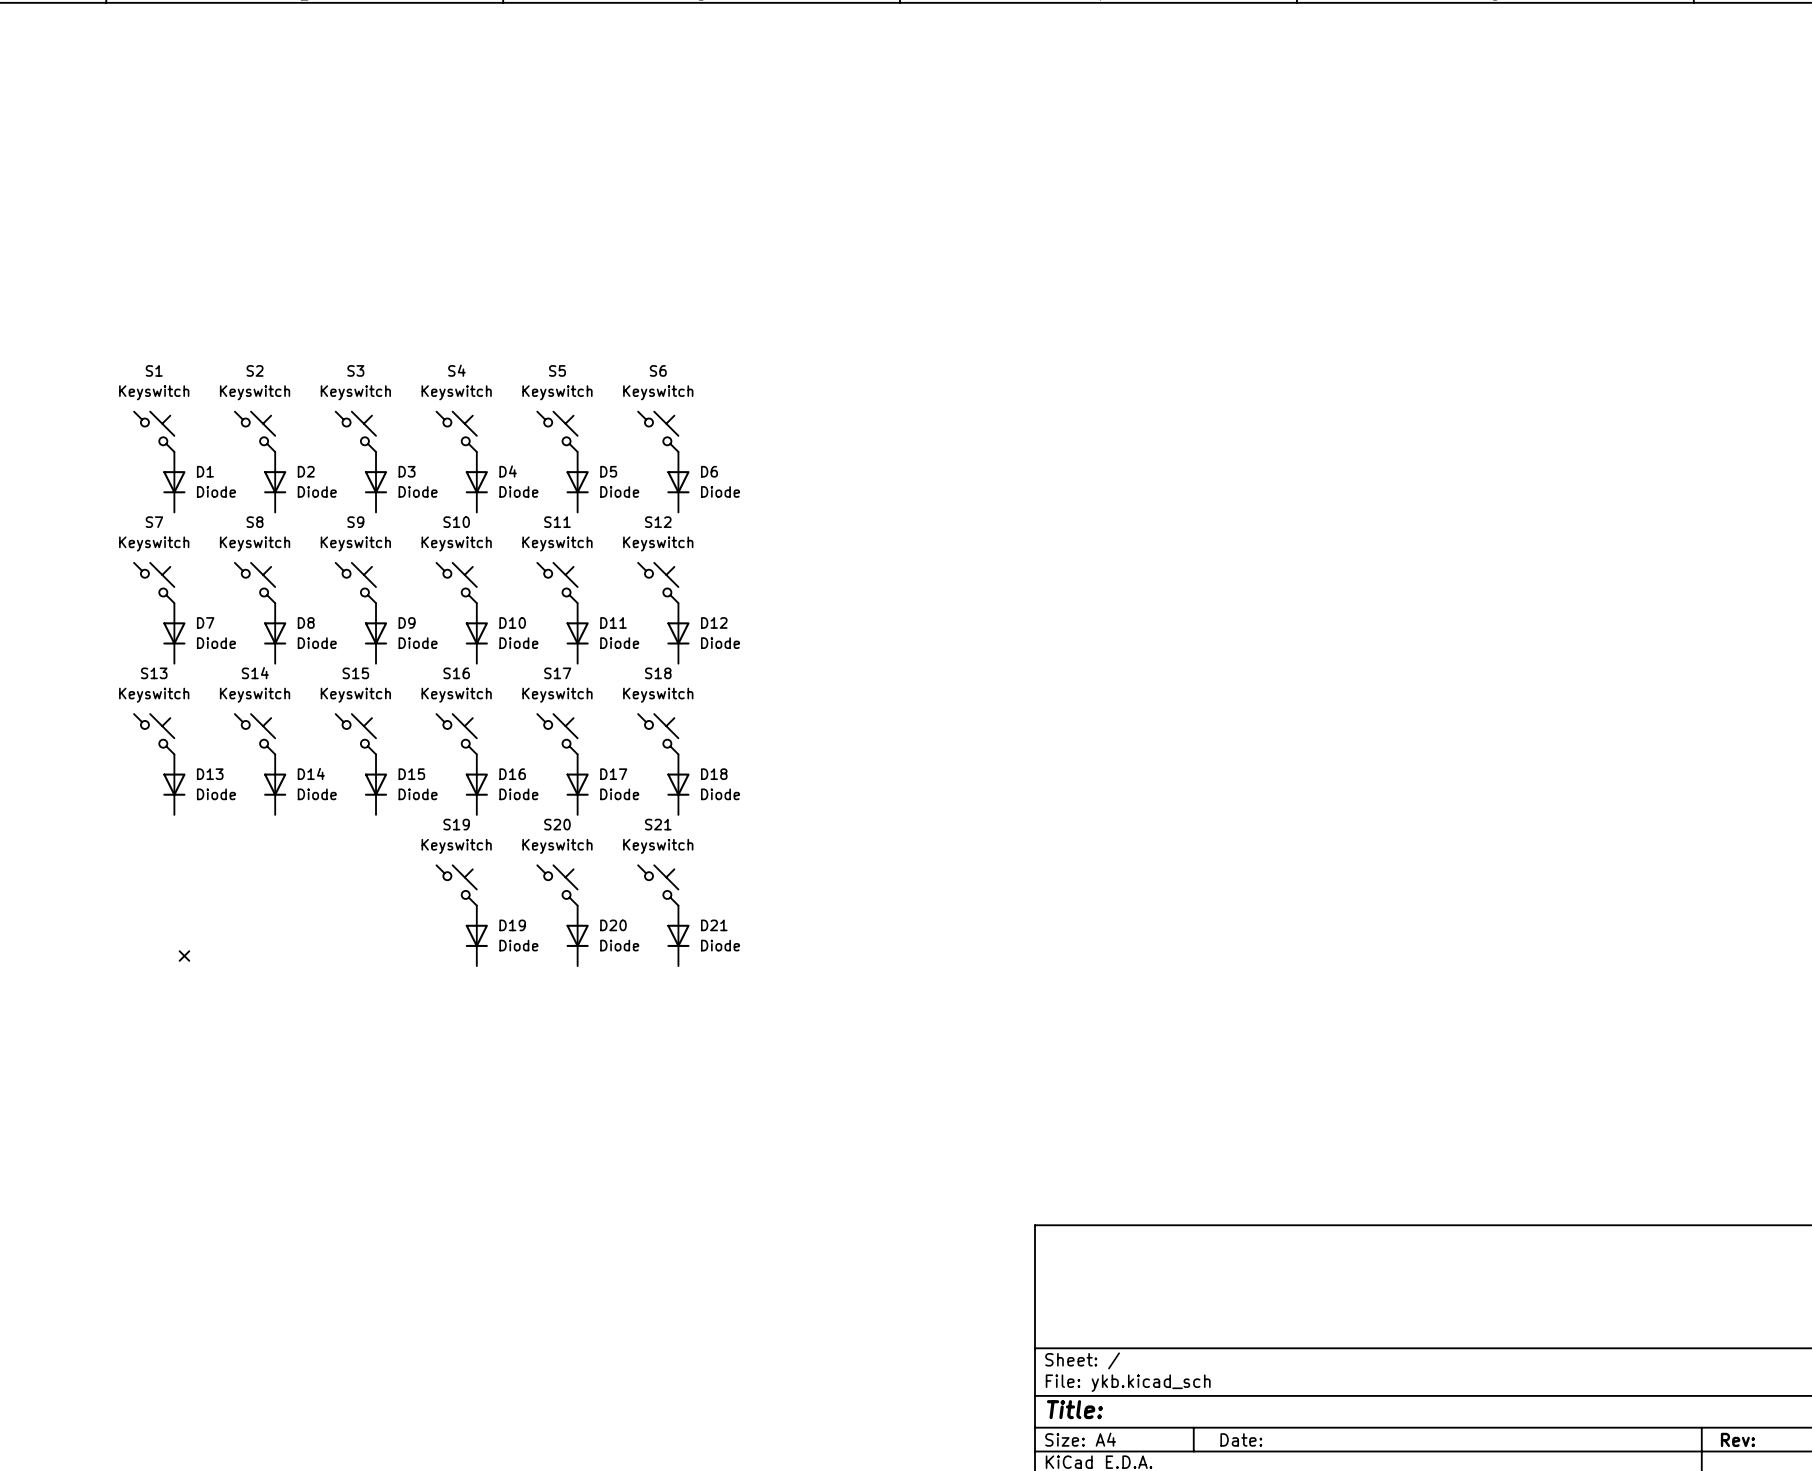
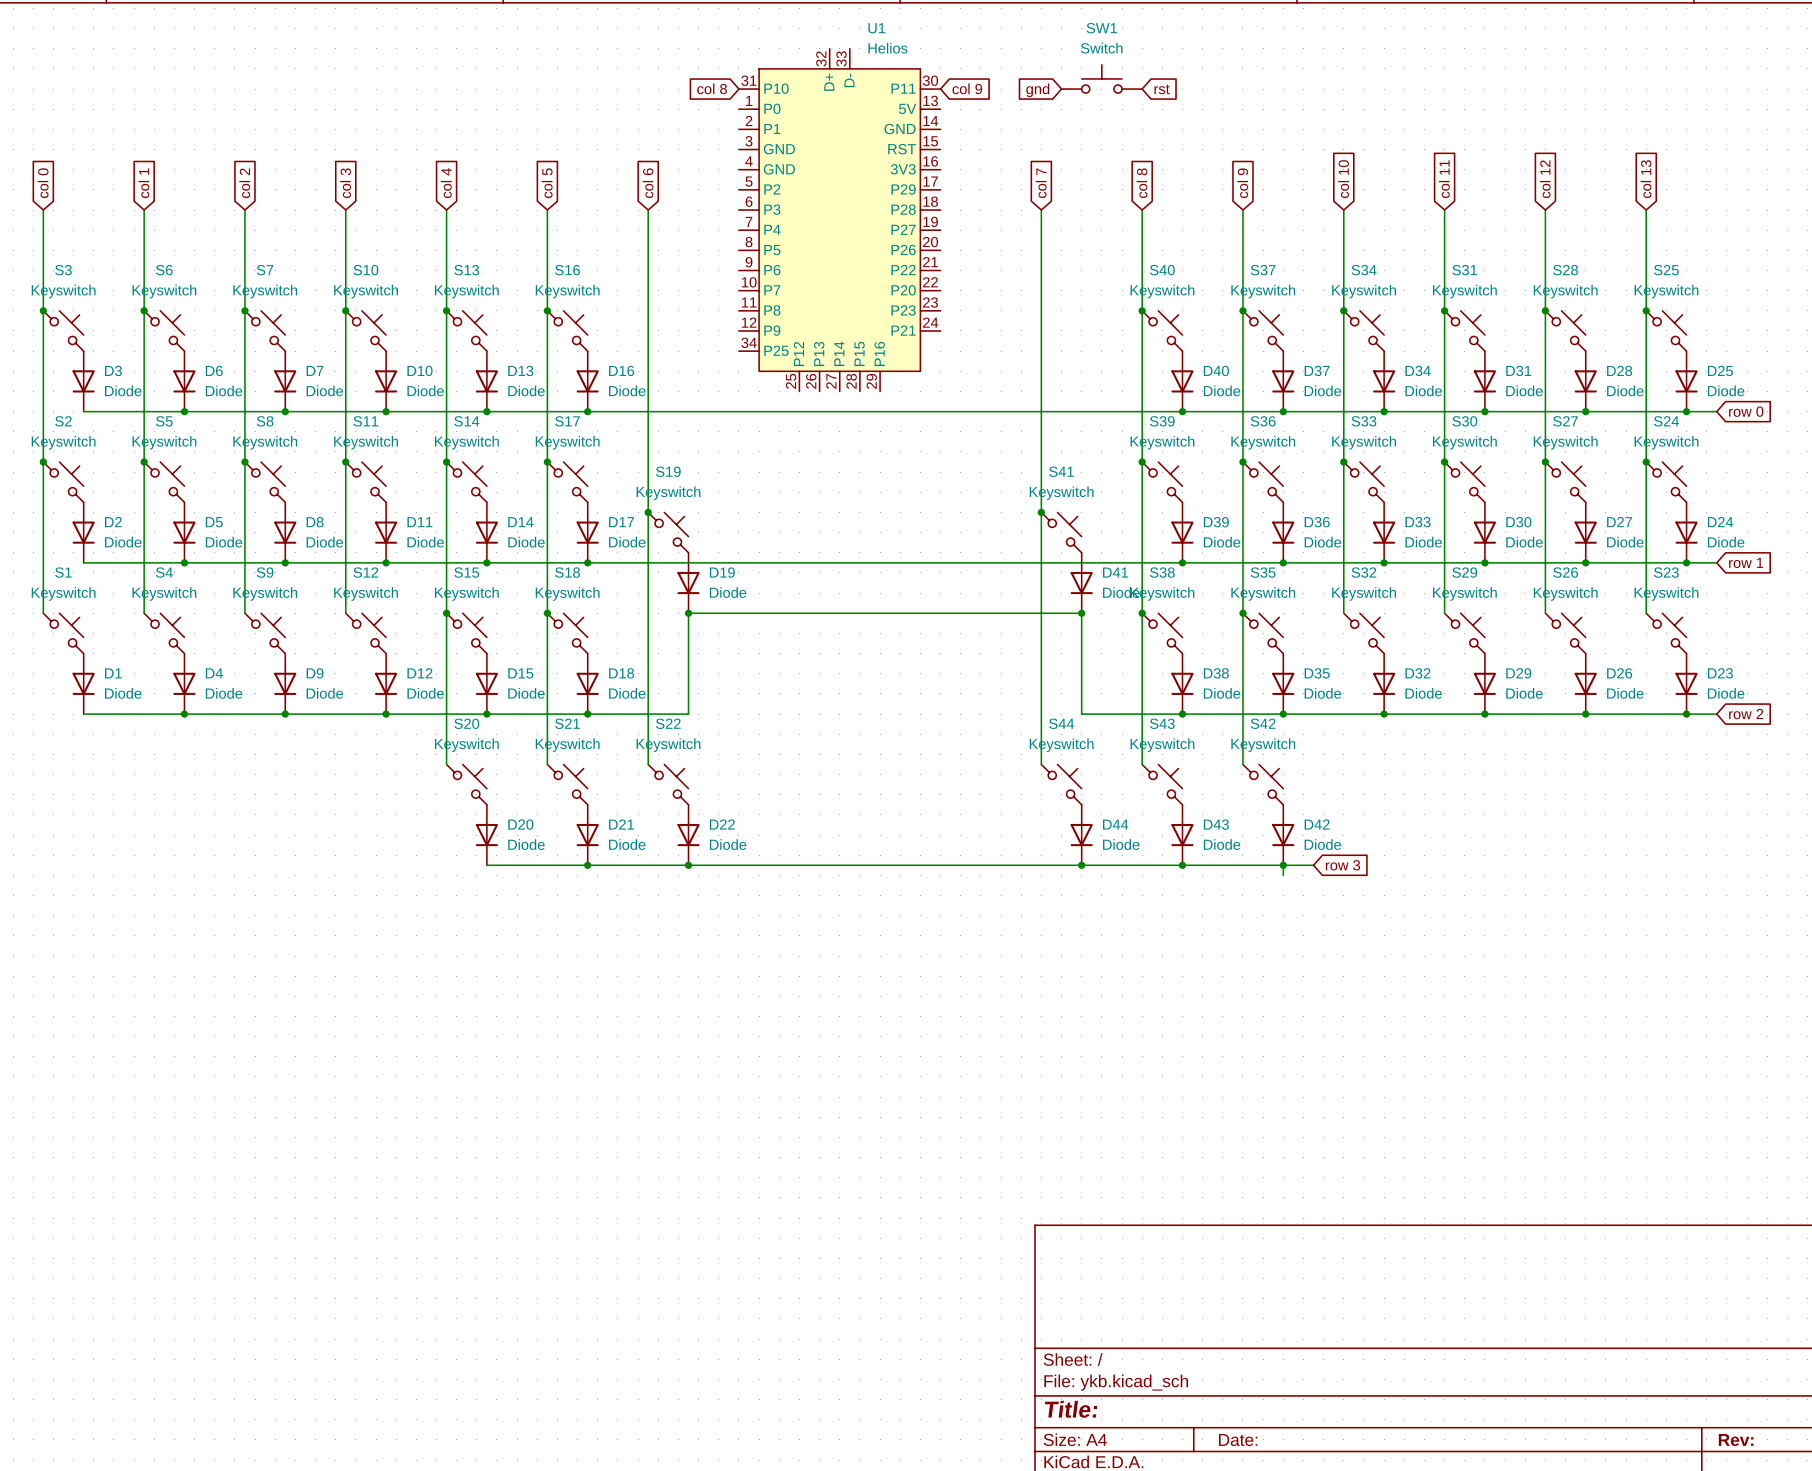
SW1: none -> Switch (1101, 78)
global label: none -> col 8 (712, 88)
global label: none -> col 9 (967, 88)
global label: none -> rst (1162, 89)
global label: none -> gnd (1037, 90)
global label: none -> col 10 (1343, 179)
global label: none -> col 11 (1444, 179)
global label: none -> col 12 (1545, 179)
global label: none -> col 13 (1646, 179)
global label: none -> col 0 (43, 183)
global label: none -> col 1 (143, 183)
global label: none -> col 2 (244, 183)
global label: none -> col 3 (345, 183)
global label: none -> col 4 (446, 183)
global label: none -> col 5 (547, 183)
global label: none -> col 6 (648, 183)
global label: none -> col 7 (1041, 183)
global label: none -> col 8 (1141, 183)
global label: none -> col 9 (1242, 183)
wire: none -> (43, 210) (43, 613)
wire: none -> (144, 210) (144, 613)
wire: none -> (244, 210) (244, 613)
wire: none -> (345, 210) (345, 613)
wire: none -> (446, 210) (446, 764)
wire: none -> (547, 210) (547, 764)
wire: none -> (648, 210) (648, 764)
wire: none -> (1041, 210) (1041, 764)
wire: none -> (1142, 210) (1142, 764)
wire: none -> (1242, 210) (1242, 764)
wire: none -> (1343, 210) (1343, 613)
wire: none -> (1444, 210) (1444, 613)
wire: none -> (1545, 210) (1545, 613)
wire: none -> (1646, 210) (1646, 613)
U1: none -> Helios (839, 220)
junction: none -> (43, 310)
junction: none -> (144, 310)
junction: none -> (244, 310)
junction: none -> (345, 310)
junction: none -> (446, 310)
junction: none -> (547, 310)
junction: none -> (1142, 310)
junction: none -> (1242, 310)
junction: none -> (1343, 310)
junction: none -> (1444, 310)
junction: none -> (1545, 310)
junction: none -> (1646, 310)
S40: none -> Keyswitch (1162, 330)
S37: none -> Keyswitch (1263, 330)
S34: none -> Keyswitch (1363, 330)
S31: none -> Keyswitch (1464, 330)
S28: none -> Keyswitch (1565, 330)
S25: none -> Keyswitch (1666, 330)
D40: none -> Diode (1182, 381)
D37: none -> Diode (1283, 381)
D34: none -> Diode (1384, 381)
D31: none -> Diode (1484, 381)
D28: none -> Diode (1585, 381)
D25: none -> Diode (1686, 381)
wire: none -> (83, 411) (1716, 411)
junction: none -> (184, 411)
junction: none -> (285, 411)
junction: none -> (386, 411)
junction: none -> (486, 411)
junction: none -> (587, 411)
junction: none -> (1182, 411)
junction: none -> (1283, 411)
junction: none -> (1384, 411)
junction: none -> (1484, 411)
junction: none -> (1585, 411)
junction: none -> (1686, 411)
global label: none -> row 0 (1746, 411)
S1 position: (154, 431) -> (63, 633)
S2 position: (255, 431) -> (63, 482)
S3 position: (355, 431) -> (63, 330)
S4 position: (456, 431) -> (164, 633)
S5 position: (557, 431) -> (164, 482)
S6 position: (658, 431) -> (164, 330)
junction: none -> (43, 462)
junction: none -> (144, 462)
junction: none -> (244, 462)
junction: none -> (345, 462)
junction: none -> (446, 462)
junction: none -> (547, 462)
junction: none -> (1142, 462)
junction: none -> (1242, 462)
junction: none -> (1343, 462)
junction: none -> (1444, 462)
junction: none -> (1545, 462)
junction: none -> (1646, 462)
D1 position: (174, 482) -> (83, 683)
D2 position: (275, 482) -> (83, 532)
D3 position: (376, 482) -> (83, 381)
D4 position: (476, 482) -> (184, 683)
D5 position: (577, 482) -> (184, 532)
D6 position: (678, 482) -> (184, 381)
S39: none -> Keyswitch (1162, 482)
S36: none -> Keyswitch (1263, 482)
S33: none -> Keyswitch (1363, 482)
S30: none -> Keyswitch (1464, 482)
S27: none -> Keyswitch (1565, 482)
S24: none -> Keyswitch (1666, 482)
junction: none -> (648, 512)
junction: none -> (1041, 512)
S41: none -> Keyswitch (1061, 532)
D39: none -> Diode (1182, 532)
D36: none -> Diode (1283, 532)
D33: none -> Diode (1384, 532)
D30: none -> Diode (1484, 532)
D27: none -> Diode (1585, 532)
D24: none -> Diode (1686, 532)
wire: none -> (83, 562) (1716, 562)
junction: none -> (184, 562)
junction: none -> (285, 562)
junction: none -> (386, 562)
junction: none -> (486, 562)
junction: none -> (587, 562)
junction: none -> (1182, 562)
junction: none -> (1283, 562)
junction: none -> (1384, 562)
junction: none -> (1484, 562)
junction: none -> (1585, 562)
junction: none -> (1686, 562)
global label: none -> row 1 (1746, 562)
S7 position: (154, 583) -> (265, 330)
S8 position: (255, 583) -> (265, 482)
S9 position: (355, 583) -> (265, 633)
S10 position: (456, 583) -> (365, 330)
S11 position: (557, 583) -> (365, 482)
S12 position: (658, 583) -> (365, 633)
D41: none -> Diode (1081, 583)
junction: none -> (446, 613)
junction: none -> (547, 613)
junction: none -> (688, 613)
junction: none -> (1081, 613)
junction: none -> (1142, 613)
junction: none -> (1242, 613)
D7 position: (174, 633) -> (285, 381)
D8 position: (275, 633) -> (285, 532)
D9 position: (376, 633) -> (285, 683)
D10 position: (476, 633) -> (386, 381)
D11 position: (577, 633) -> (386, 532)
D12 position: (678, 633) -> (386, 683)
S38: none -> Keyswitch (1162, 633)
S35: none -> Keyswitch (1263, 633)
S32: none -> Keyswitch (1363, 633)
S29: none -> Keyswitch (1464, 633)
S26: none -> Keyswitch (1565, 633)
S23: none -> Keyswitch (1666, 633)
D38: none -> Diode (1182, 683)
D35: none -> Diode (1283, 683)
D32: none -> Diode (1384, 683)
D29: none -> Diode (1484, 683)
D26: none -> Diode (1585, 683)
D23: none -> Diode (1686, 683)
wire: none -> (83, 714) (688, 714) (688, 613) (1081, 613) (1081, 714) (1716, 714)
junction: none -> (184, 714)
junction: none -> (285, 714)
junction: none -> (386, 714)
junction: none -> (486, 714)
junction: none -> (587, 714)
junction: none -> (1182, 714)
junction: none -> (1283, 714)
junction: none -> (1384, 714)
junction: none -> (1484, 714)
junction: none -> (1585, 714)
junction: none -> (1686, 714)
global label: none -> row 2 (1746, 714)
S13 position: (154, 734) -> (466, 330)
S14 position: (255, 734) -> (466, 482)
S15 position: (355, 734) -> (466, 633)
S16 position: (456, 734) -> (567, 330)
S17 position: (557, 734) -> (567, 482)
S18 position: (658, 734) -> (567, 633)
D13 position: (174, 784) -> (486, 381)
D14 position: (275, 784) -> (486, 532)
D15 position: (376, 784) -> (486, 683)
D16 position: (476, 784) -> (587, 381)
D17 position: (577, 784) -> (587, 532)
S22: none -> Keyswitch (668, 784)
D18 position: (678, 784) -> (587, 683)
S44: none -> Keyswitch (1061, 784)
S43: none -> Keyswitch (1162, 784)
S42: none -> Keyswitch (1263, 784)
D22: none -> Diode (688, 835)
D44: none -> Diode (1081, 835)
D43: none -> Diode (1182, 835)
D42: none -> Diode (1283, 835)
wire: none -> (486, 865) (1313, 865)
junction: none -> (587, 865)
junction: none -> (688, 865)
junction: none -> (1081, 865)
junction: none -> (1182, 865)
wire: none -> (1283, 865) (1283, 875)
junction: none -> (1283, 865)
global label: none -> row 3 (1342, 865)
S19 position: (456, 885) -> (668, 532)
S20 position: (557, 885) -> (466, 784)
S21 position: (658, 885) -> (567, 784)
D19 position: (476, 935) -> (688, 583)
D20 position: (577, 935) -> (486, 835)
D21 position: (678, 935) -> (587, 835)
no-connect mark: (184, 956) -> none

